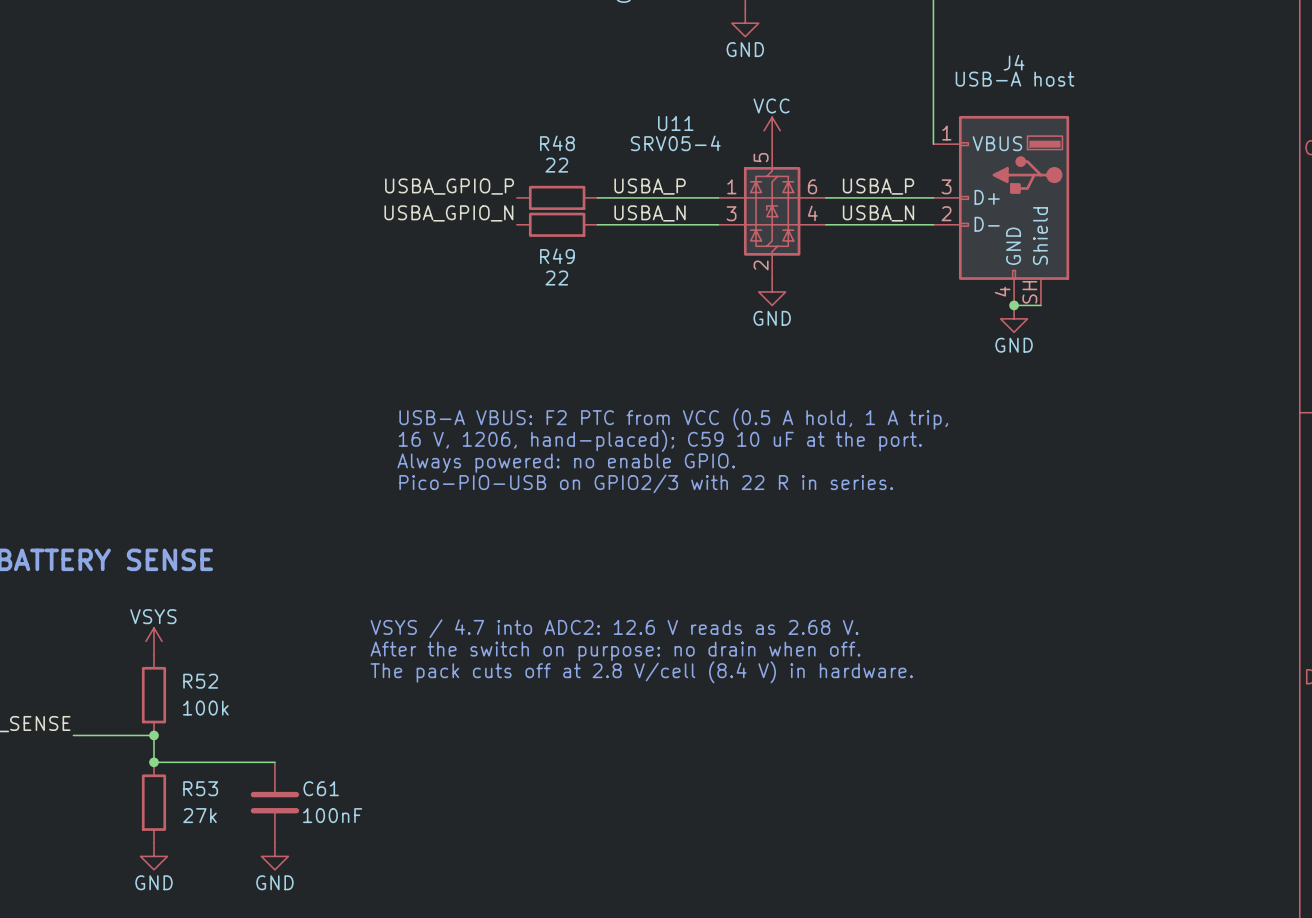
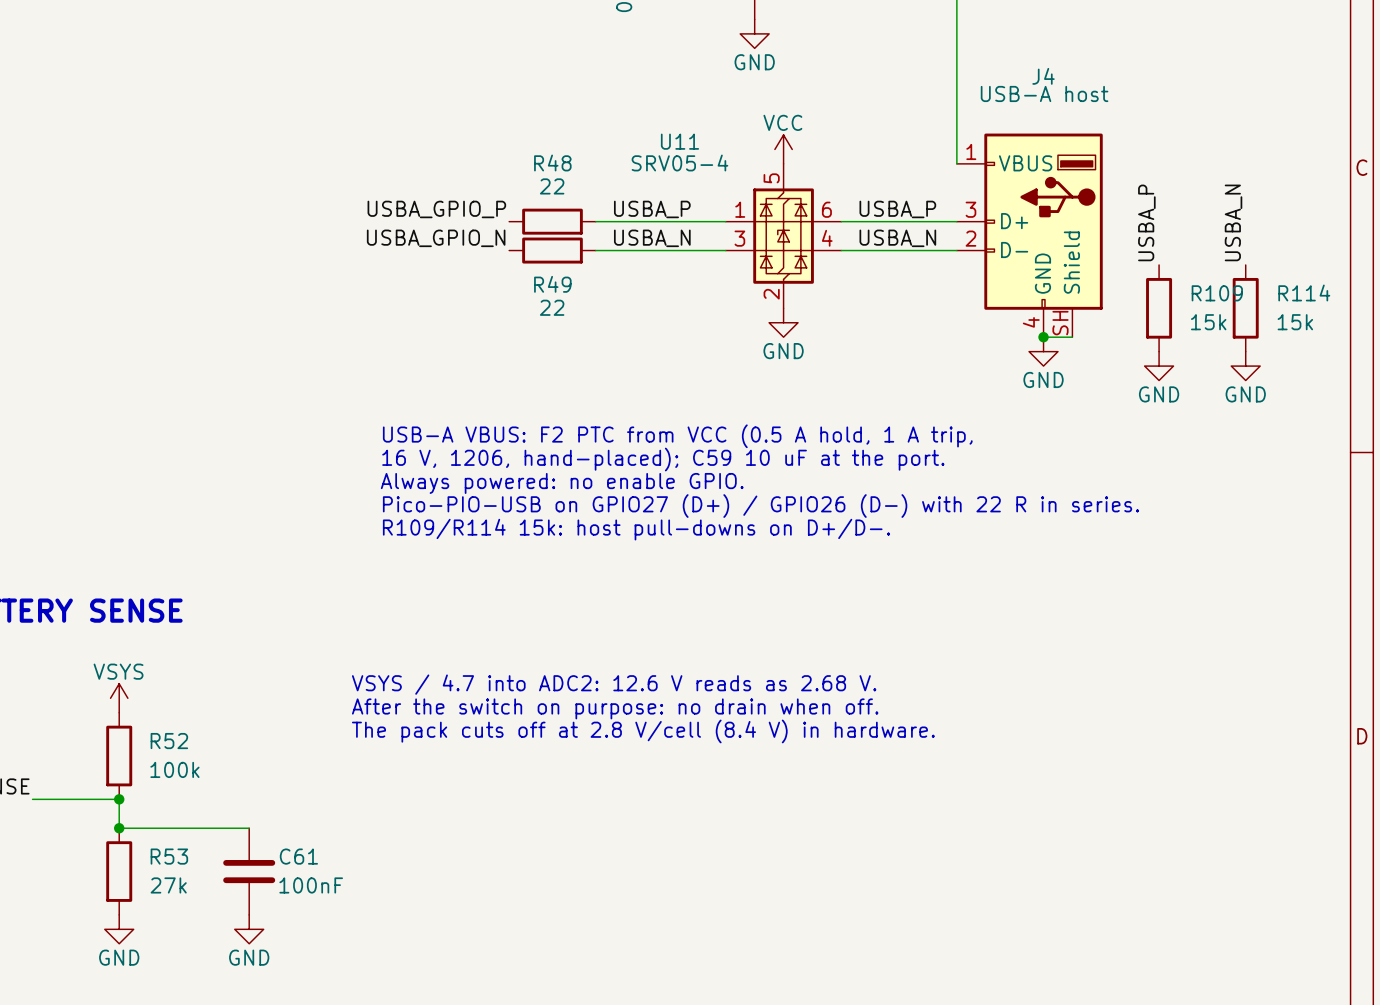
label: none -> USBA_P (1146, 222)
label: none -> USBA_N (1233, 222)
R109: none -> 15k (1159, 308)
R114: none -> 15k (1245, 308)
power symbol: none -> GND (1159, 366)
power symbol: none -> GND (1245, 366)
text: none -> USB-A VBUS: F2 PTC from VCC (0.5 A hold, 1 A trip, (677, 436)
text: USB-A VBUS: F2 PTC from VCC (0.5 A hold, 1 A trip, (673, 419) -> 16 V, 1206, hand-placed); C59 10 uF at the port. (663, 459)
text: 16 V, 1206, hand-placed); C59 10 uF at the port. (660, 440) -> Always powered: no enable GPIO. (562, 483)
text: Always powered: no enable GPIO. (566, 463) -> Pico-PIO-USB on GPIO27 (D+) / GPIO26 (D-) with 22 R in series. (760, 506)
text: Pico-PIO-USB on GPIO2/3 with 22 R in series. (646, 483) -> R109/R114 15k: host pull-downs on D+/D-. (636, 529)

